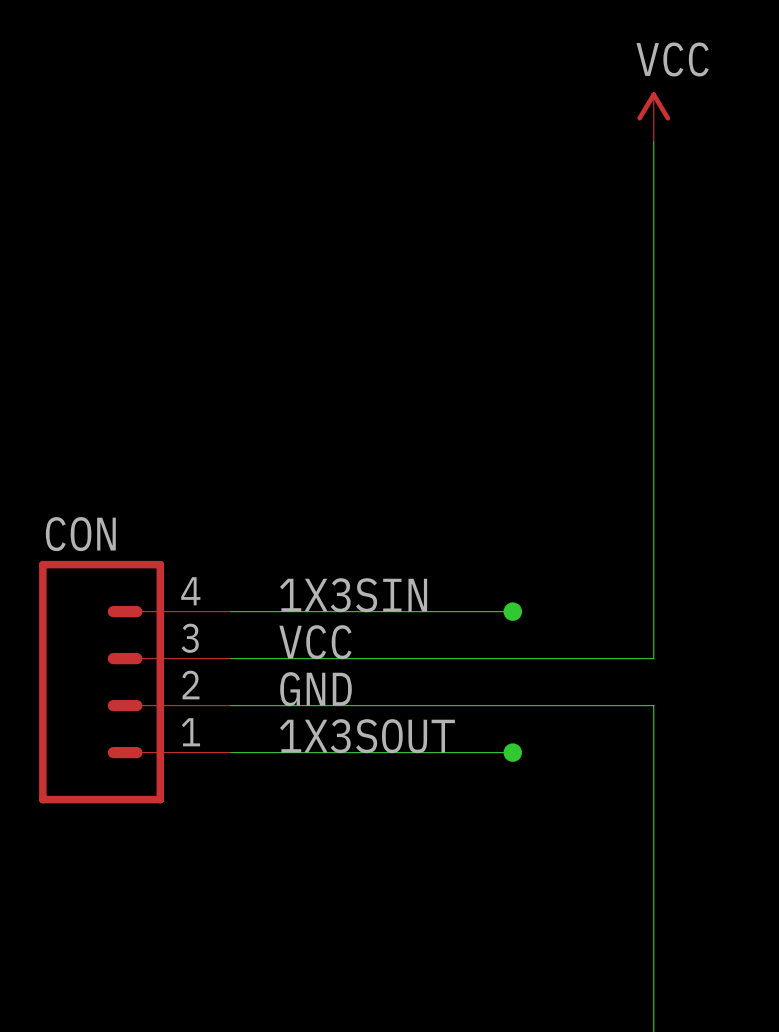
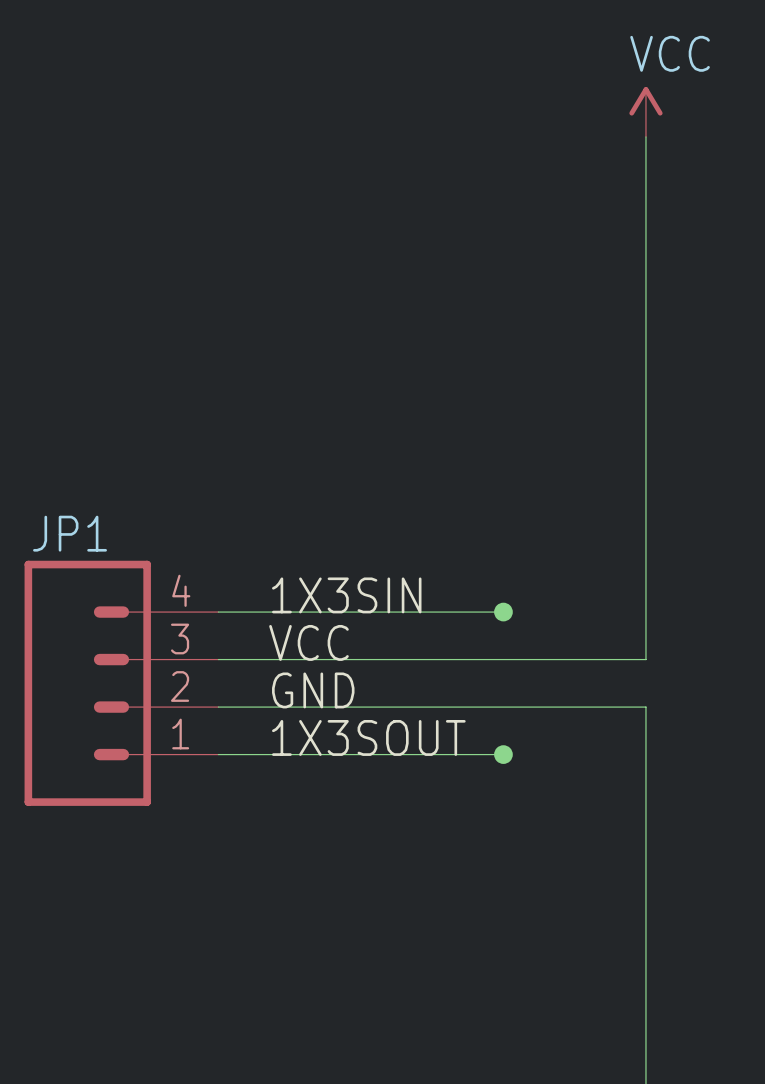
CON name: CON (80, 534) -> JP1 (70, 533)

